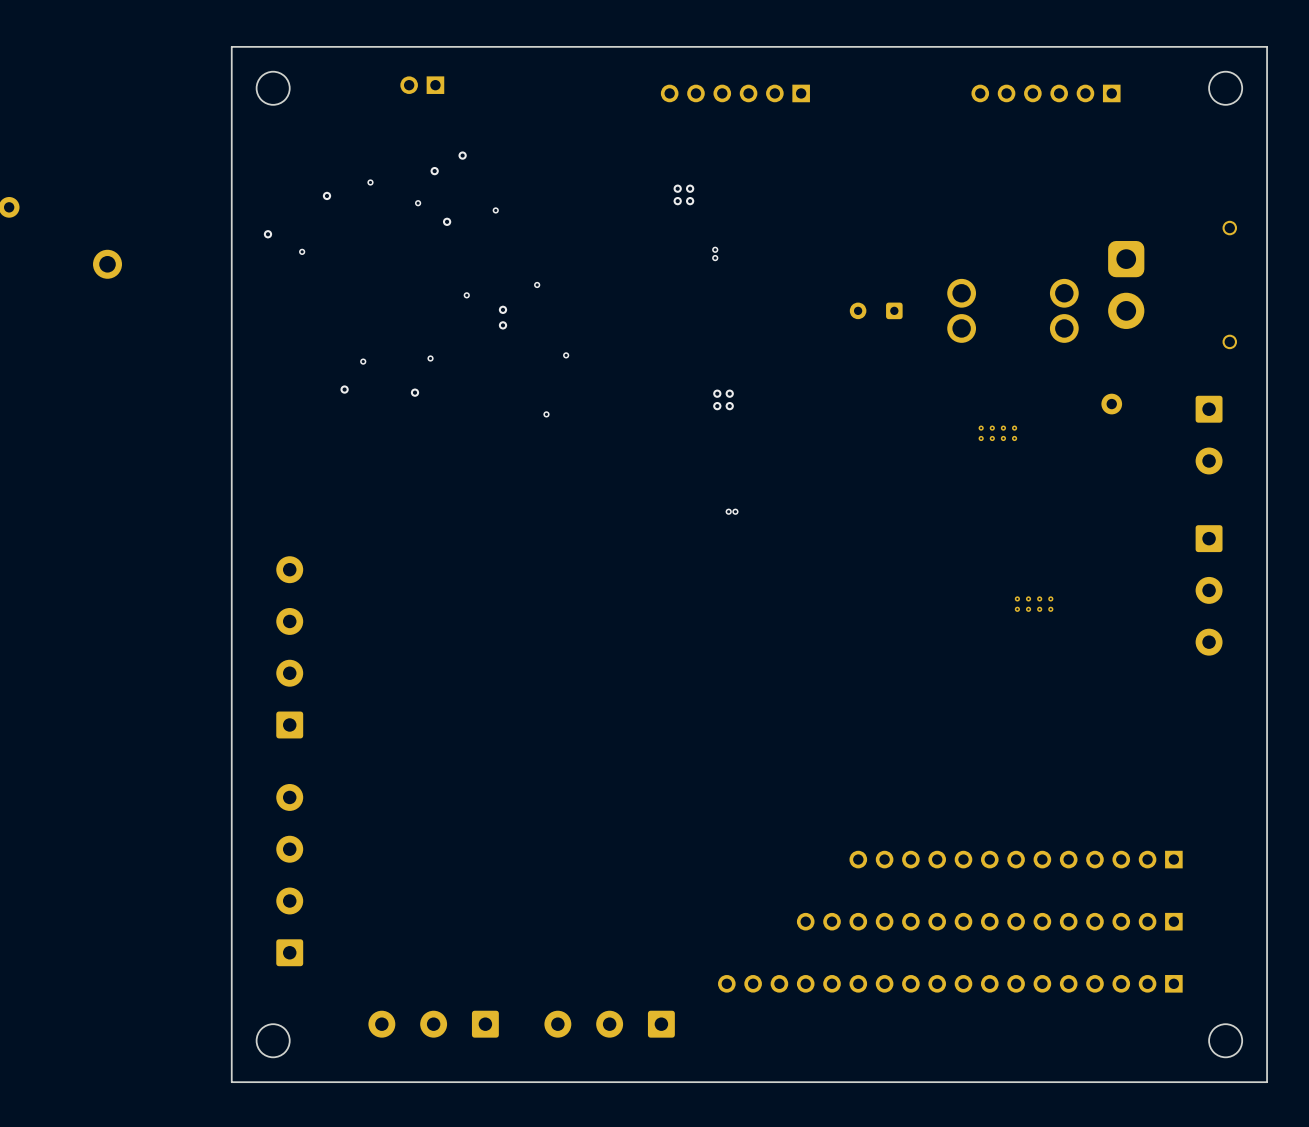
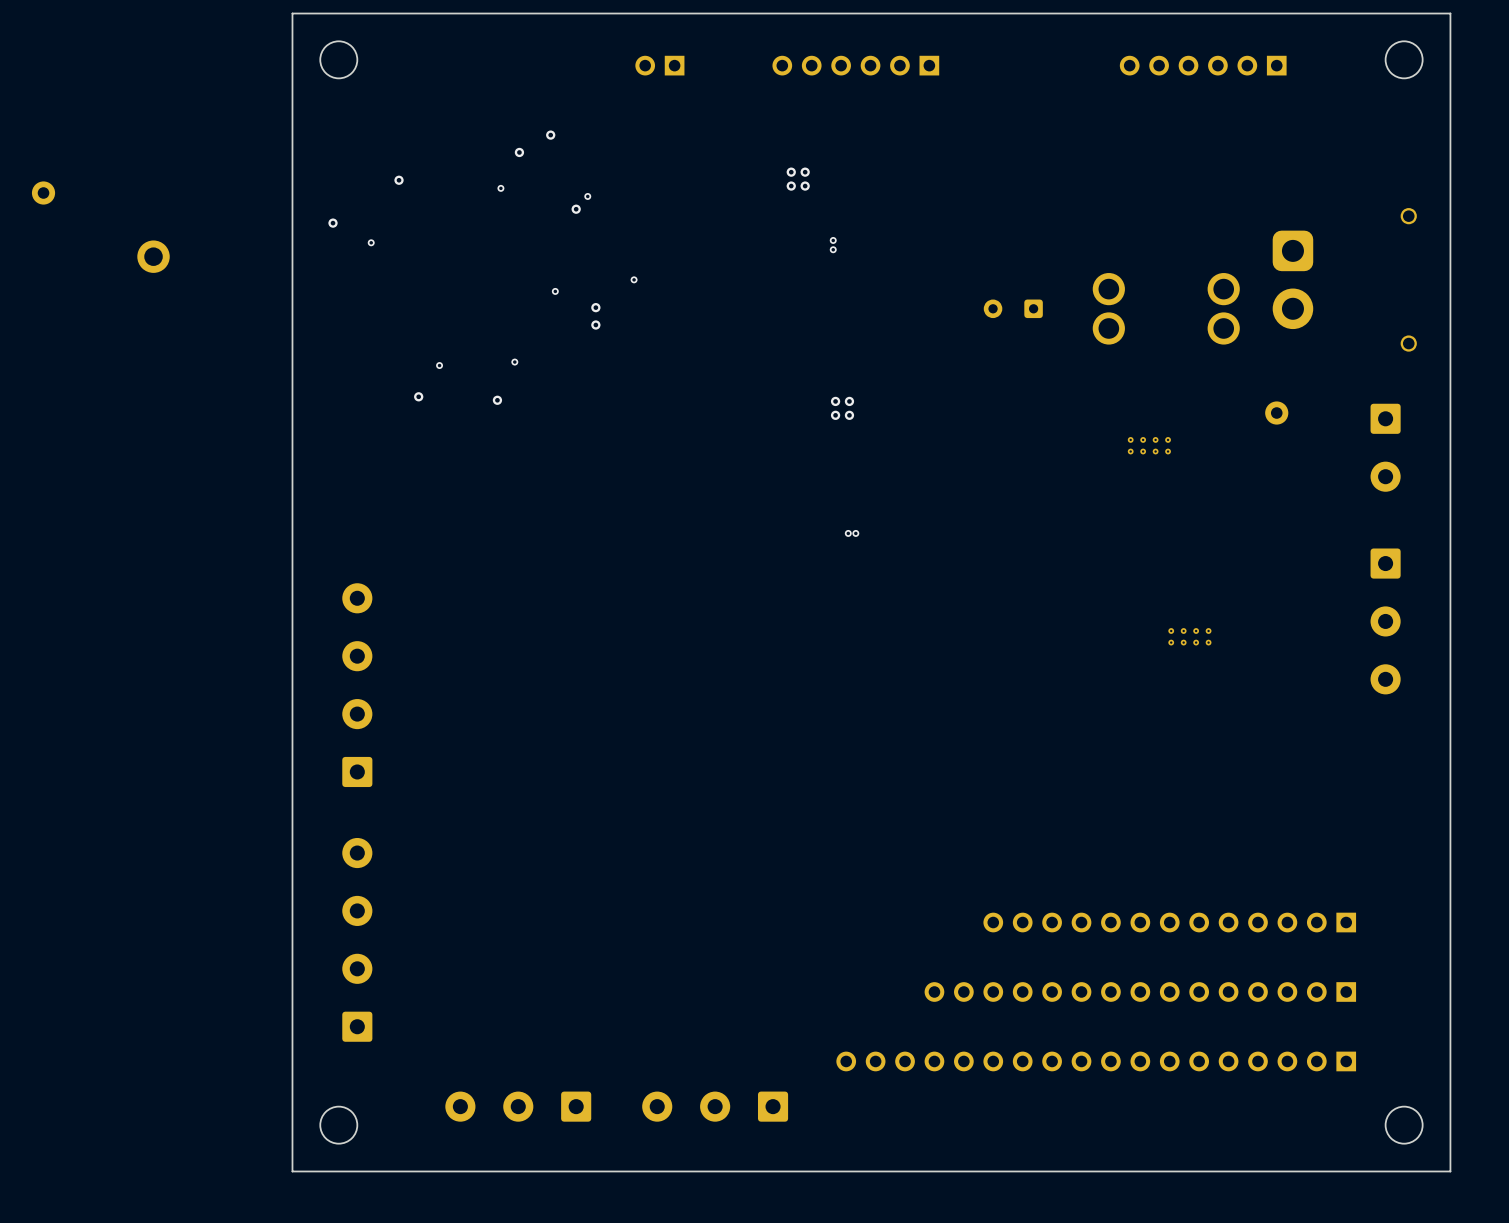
part position: (422, 85) -> (659, 65)
via: (370, 182) -> none
via position: (447, 221) -> (576, 209)
via: (566, 355) -> none
via: (546, 414) -> none

